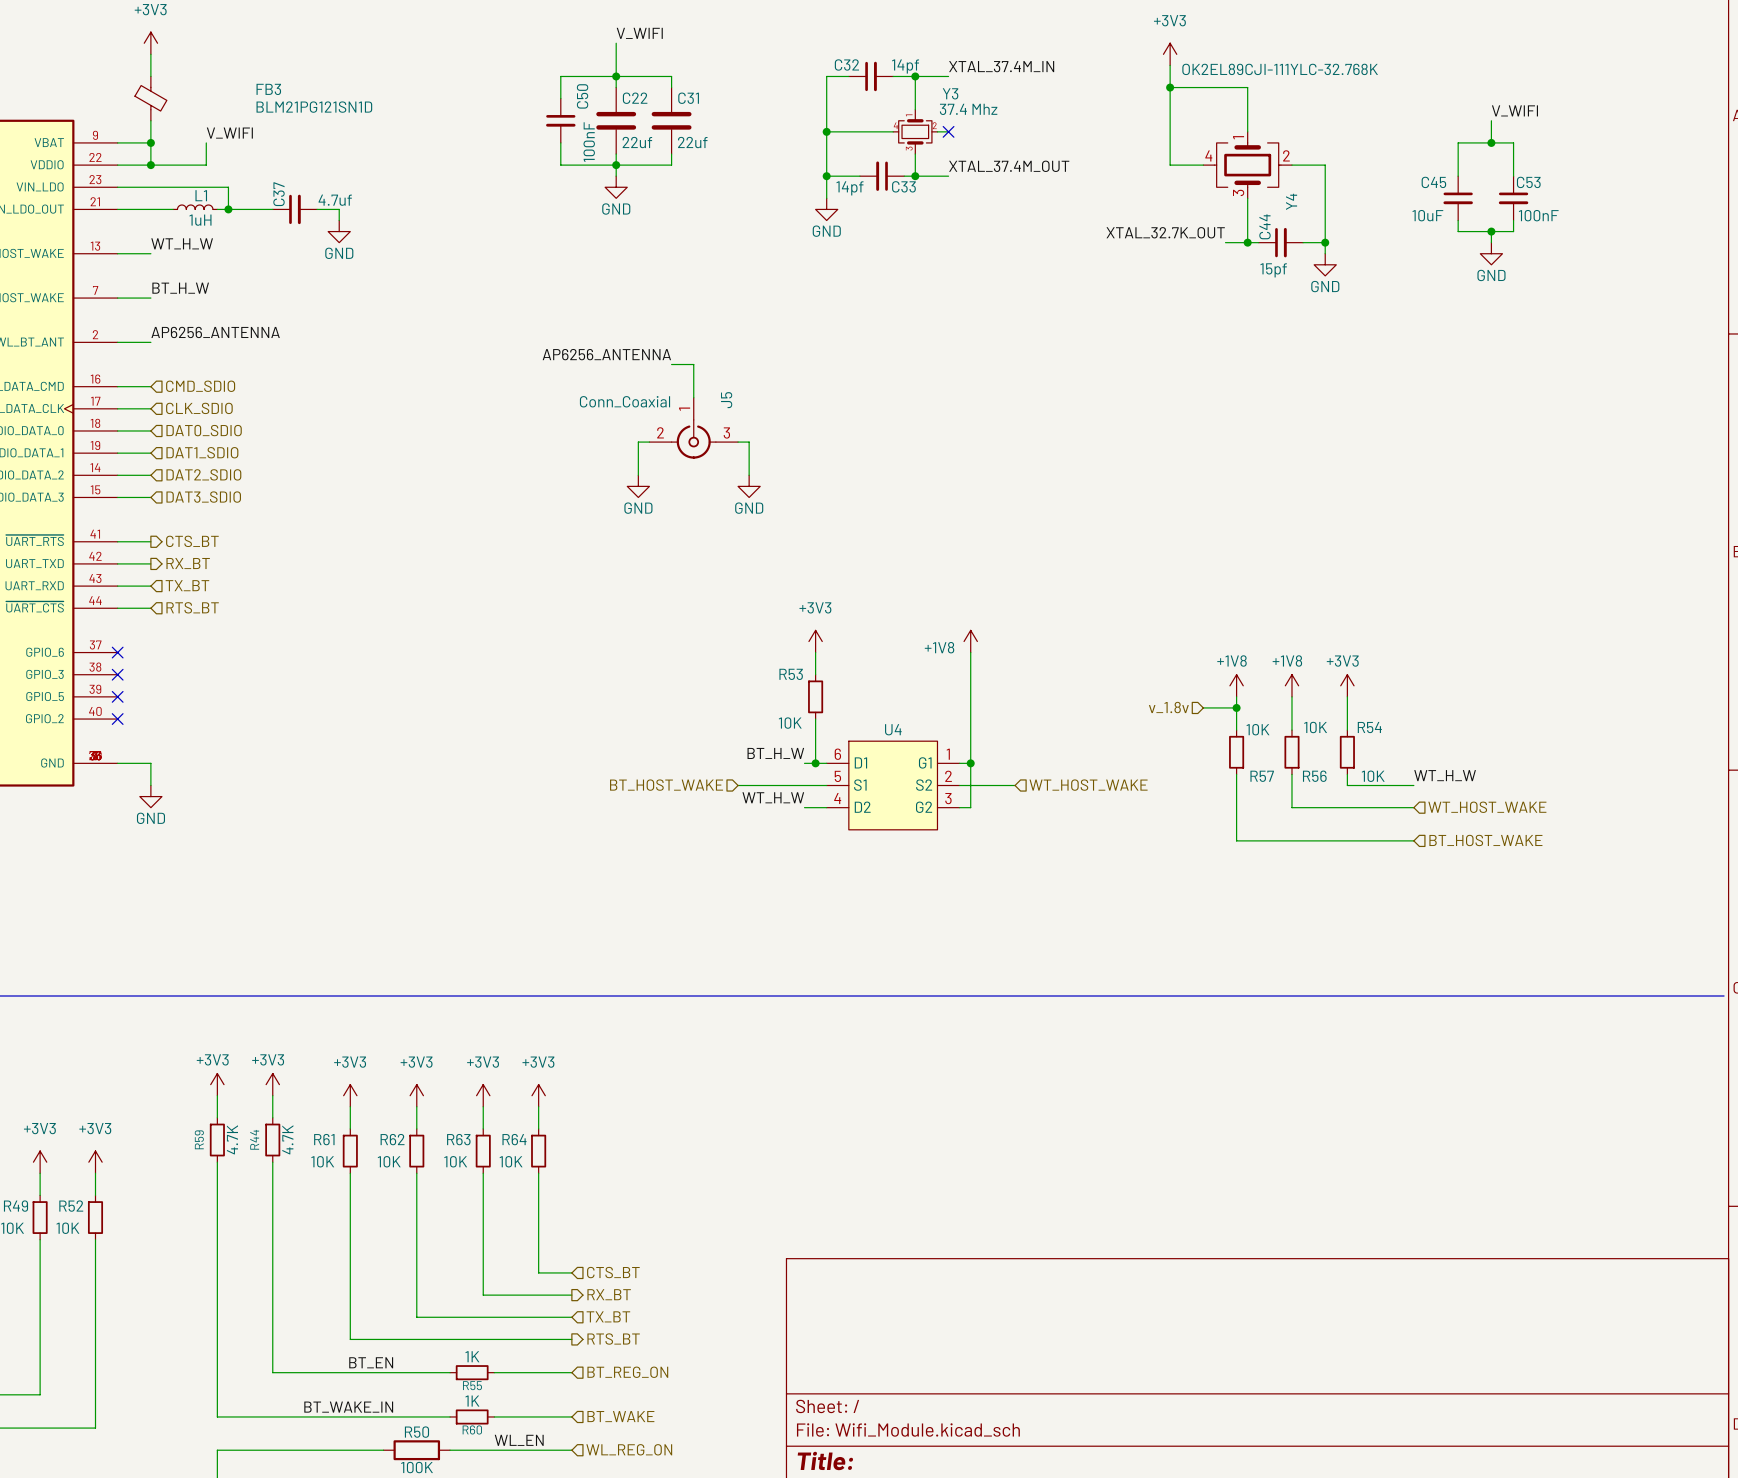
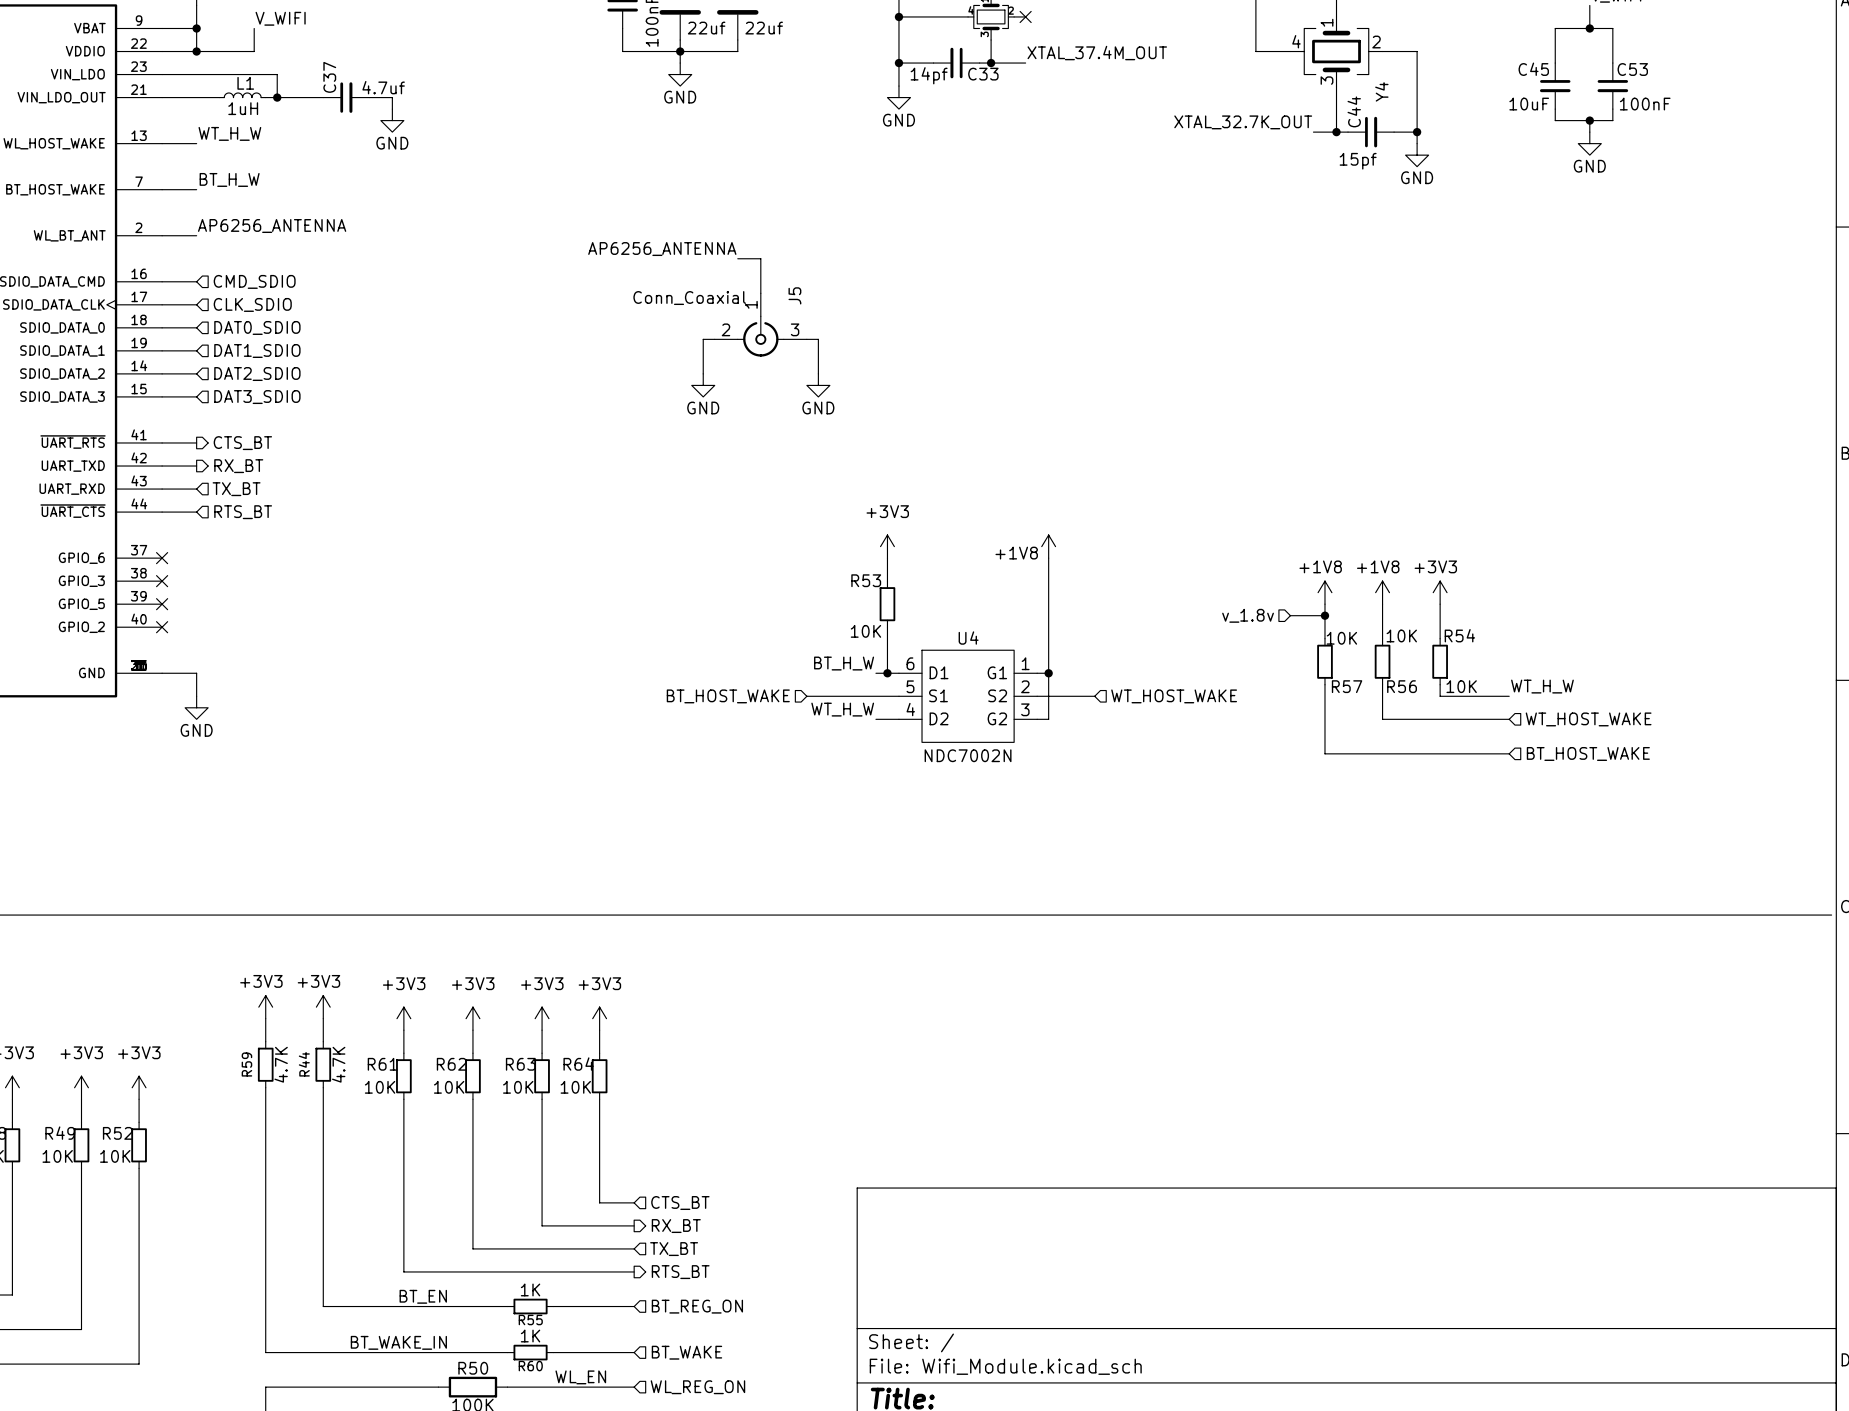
U4 text: none -> NDC7002N (968, 755)

